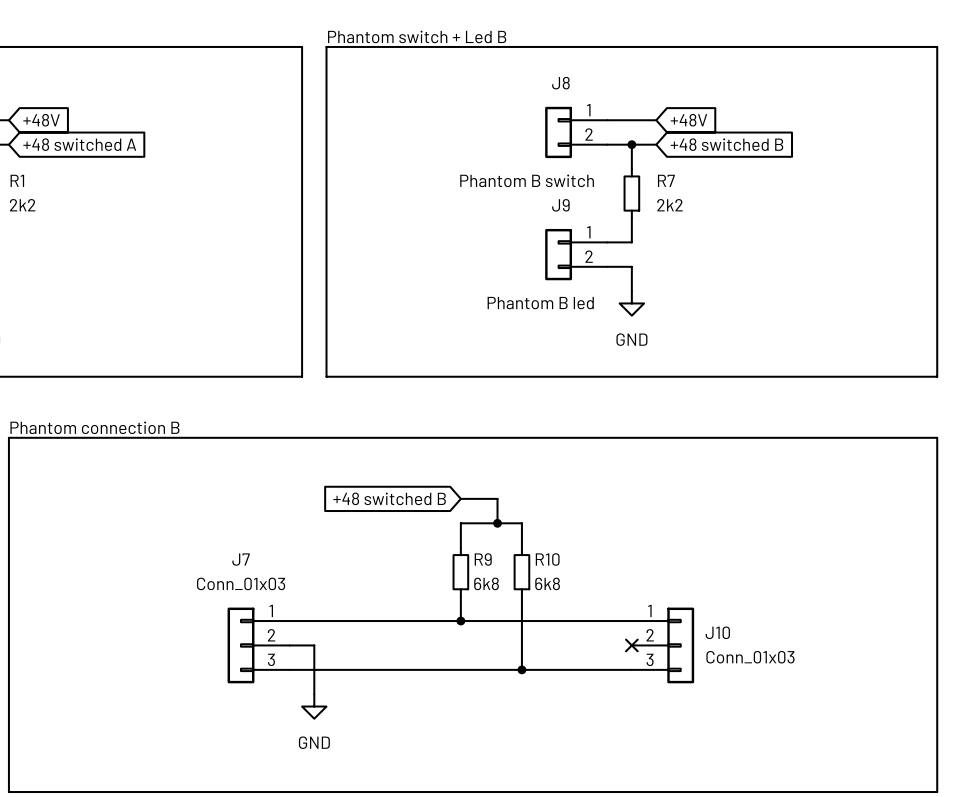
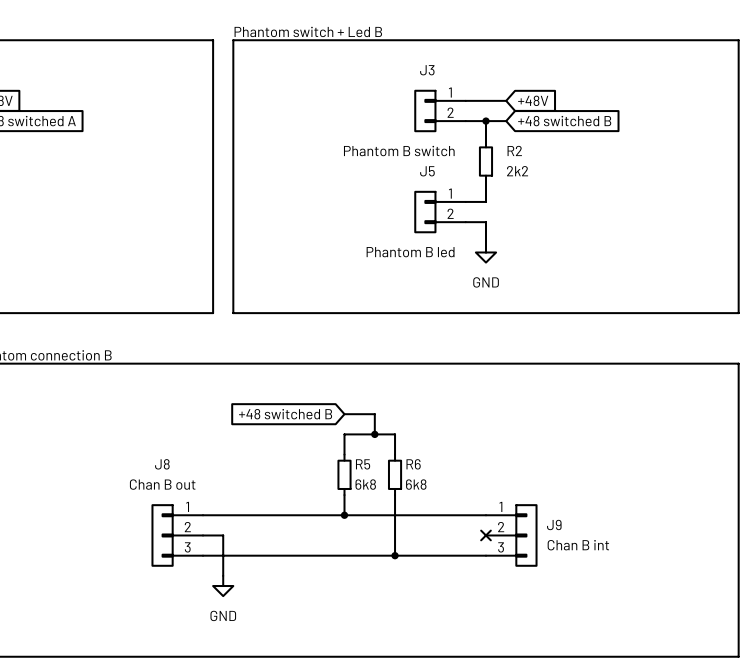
J8 name: J8 (560, 83) -> J3 (427, 70)
R7 name: R7 (666, 180) -> R2 (514, 150)
J9 name: J9 (560, 205) -> J5 (427, 171)
J7 name: J7 (241, 559) -> J8 (162, 464)
R9 name: R9 (483, 559) -> R5 (363, 464)
R10 name: R10 (547, 559) -> R6 (413, 464)
J7 value: Conn_01x03 (241, 583) -> Chan B out (162, 484)
J10 name: J10 (717, 632) -> J9 (554, 524)
J10 value: Conn_01x03 (750, 657) -> Chan B int (578, 545)

